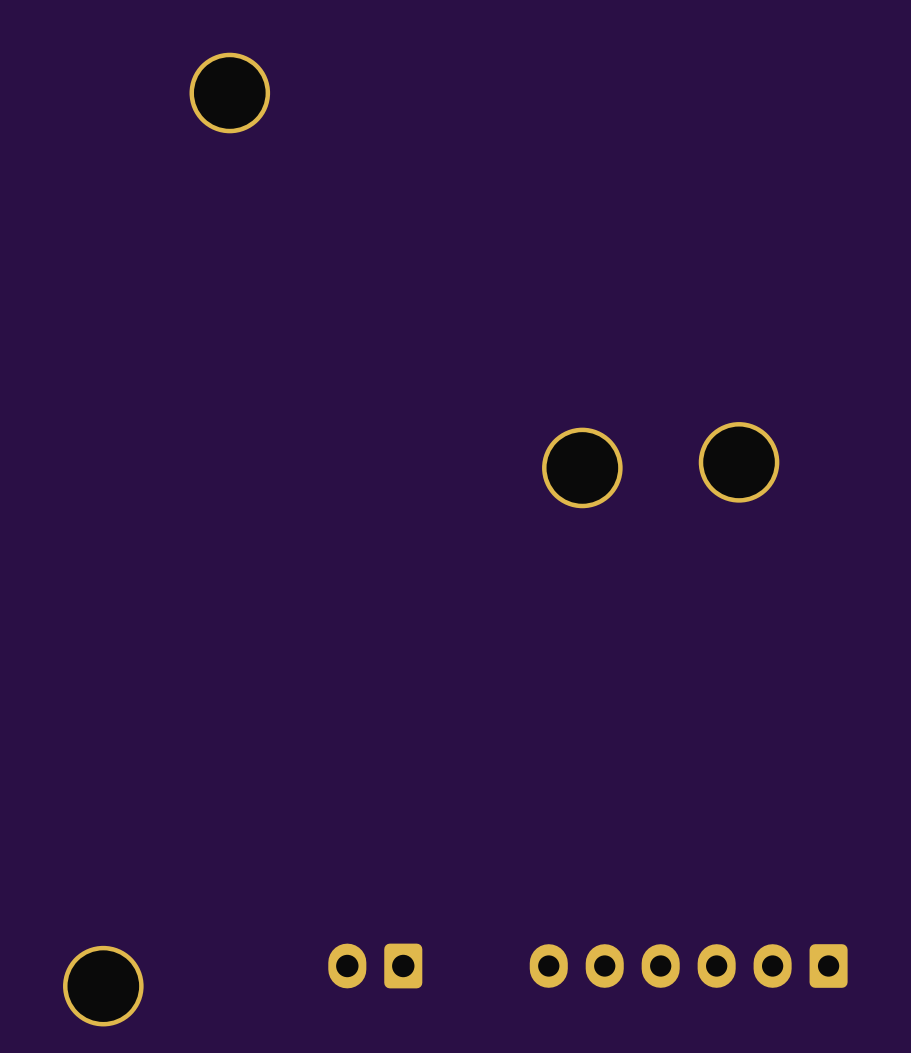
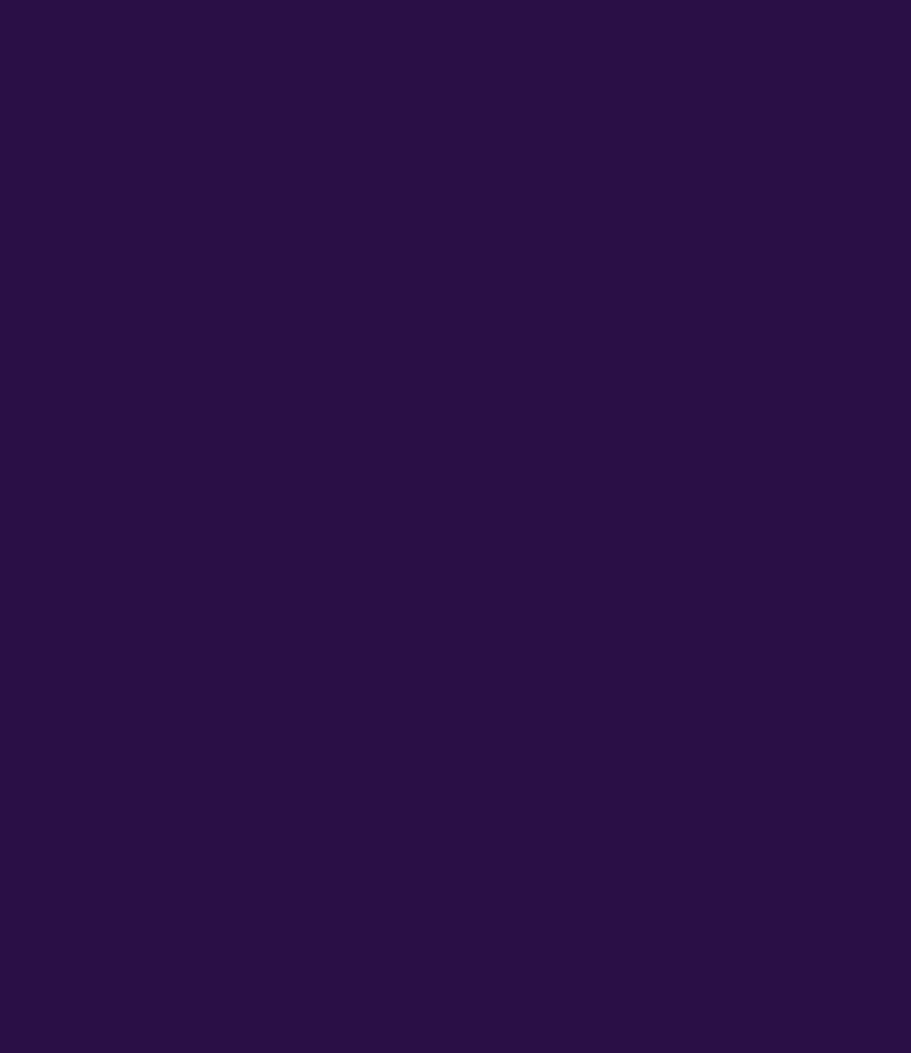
part: (229, 93) -> none
part: (739, 462) -> none
part: (582, 467) -> none
part: (375, 966) -> none
part: (688, 966) -> none
part: (103, 986) -> none

